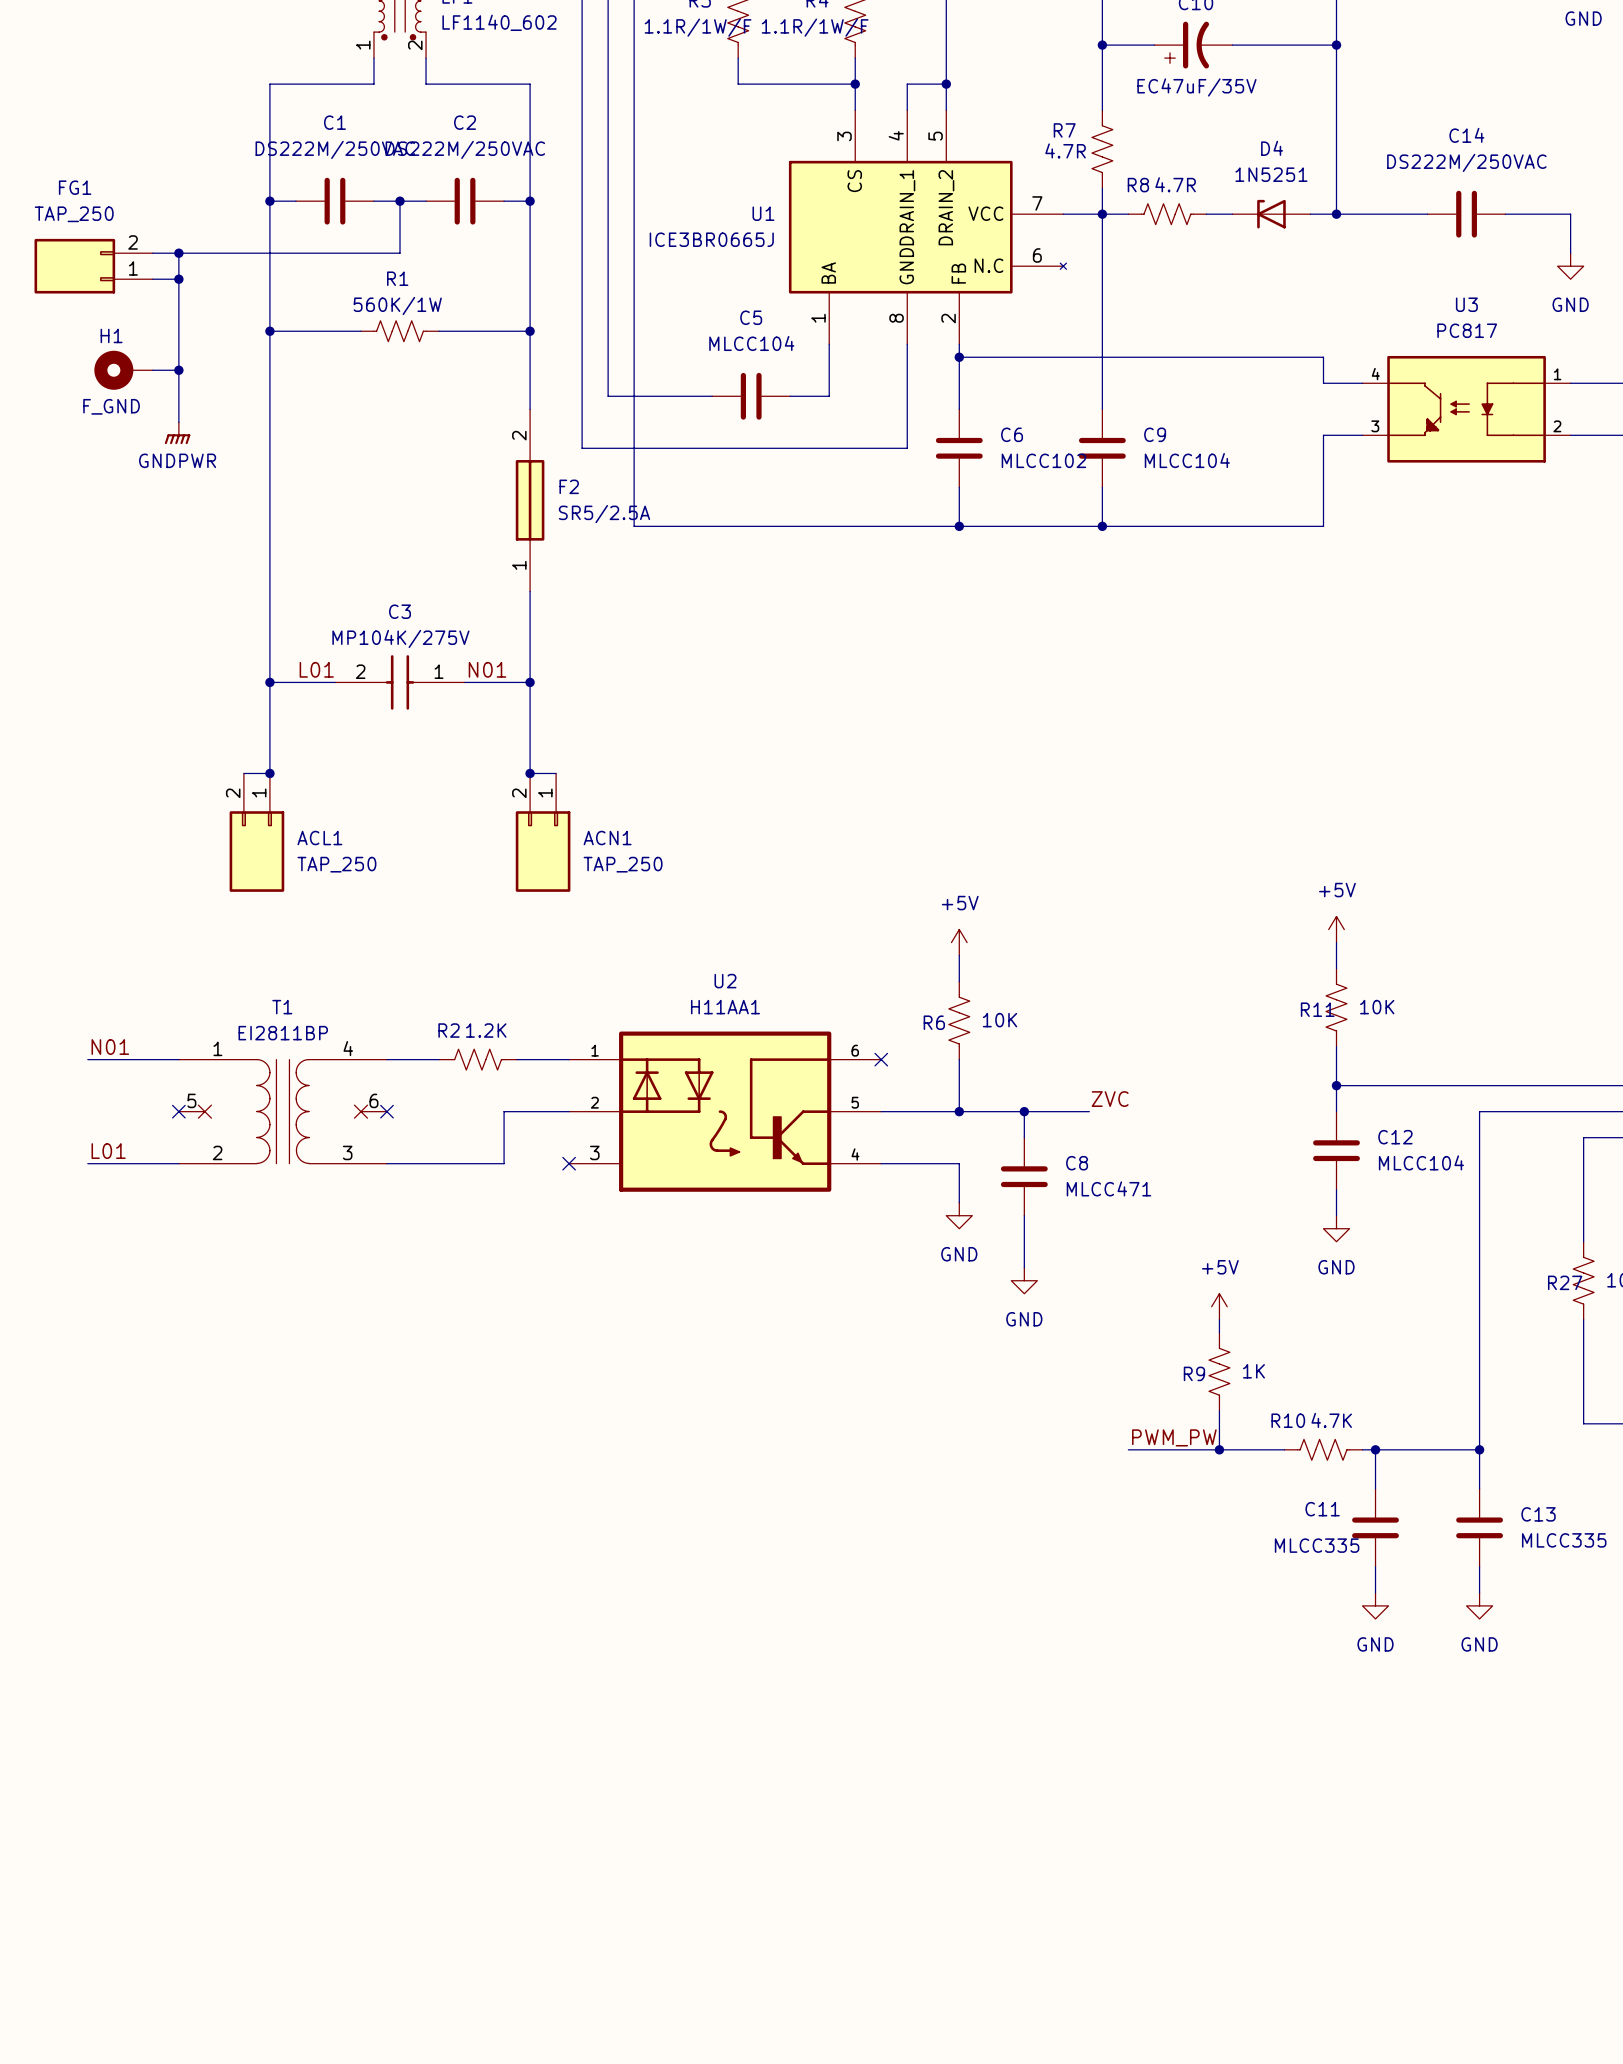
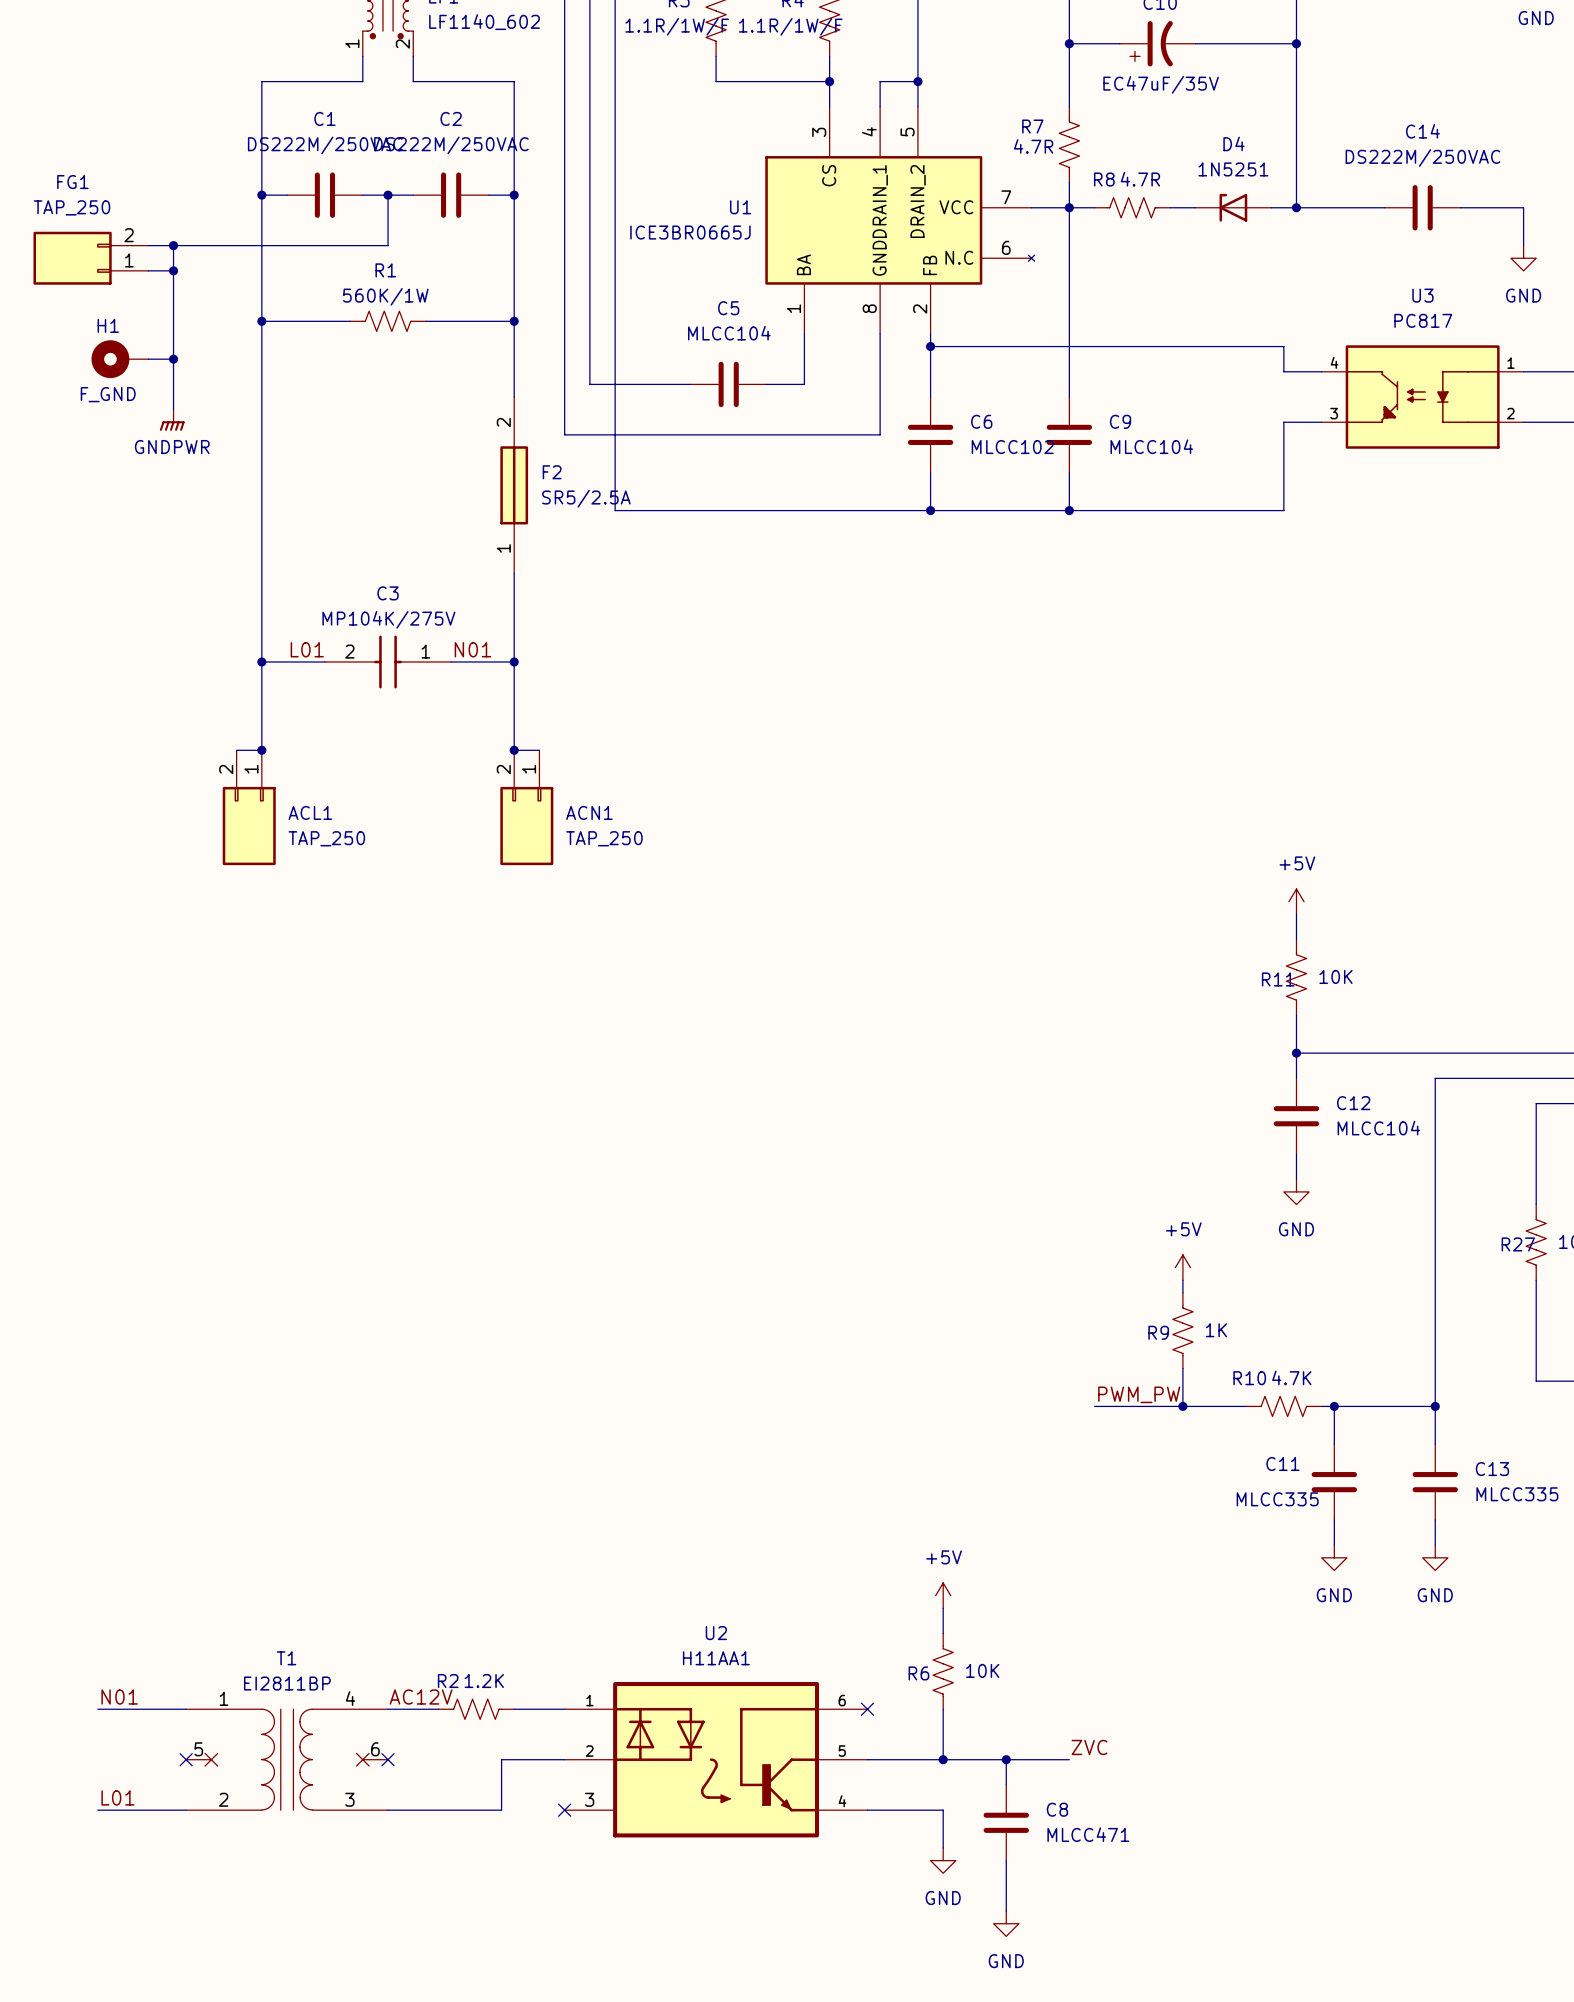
power symbol: +5V (959, 942) -> none
wire: (959, 955) (959, 981) -> none
R6 position: (959, 1020) -> (943, 1671)
label: N01 (110, 1047) -> none
wire: (87, 1059) (178, 1059) -> none
wire: (386, 1059) (439, 1059) -> none
R2 position: (478, 1059) -> (476, 1709)
wire: (517, 1059) (569, 1059) -> none
no-connect mark: (881, 1059) -> none
wire: (959, 1059) (959, 1111) -> none
label: ZVC (1110, 1099) -> none
no-connect mark: (178, 1111) -> none
T1 position: (282, 1111) -> (287, 1759)
no-connect mark: (386, 1111) -> none
wire: (569, 1111) (504, 1111) (504, 1163) (386, 1163) -> none
U2 position: (725, 1111) -> (716, 1759)
wire: (881, 1111) (1089, 1111) -> none
junction: (959, 1111) -> none
wire: (1024, 1111) (1024, 1137) -> none
junction: (1024, 1111) -> none
label: L01 (108, 1151) -> none
wire: (87, 1163) (178, 1163) -> none
no-connect mark: (569, 1163) -> none
wire: (881, 1163) (959, 1163) (959, 1202) -> none
C8 position: (1024, 1176) -> (1006, 1822)
power symbol: GND (959, 1215) -> none
wire: (1024, 1215) (1024, 1267) -> none
power symbol: GND (1024, 1280) -> none
power symbol: none -> +5V (943, 1595)
wire: none -> (943, 1608) (943, 1633)
label: none -> N01 (119, 1697)
label: none -> AC12V (421, 1697)
wire: none -> (97, 1709) (186, 1709)
wire: none -> (388, 1709) (438, 1709)
wire: none -> (514, 1709) (564, 1709)
no-connect mark: none -> (867, 1709)
wire: none -> (943, 1709) (943, 1759)
label: none -> ZVC (1089, 1747)
no-connect mark: none -> (186, 1759)
no-connect mark: none -> (388, 1759)
wire: none -> (564, 1759) (501, 1759) (501, 1810) (388, 1810)
wire: none -> (867, 1759) (1069, 1759)
junction: none -> (943, 1759)
wire: none -> (1006, 1759) (1006, 1784)
junction: none -> (1006, 1759)
label: none -> L01 (117, 1797)
wire: none -> (97, 1810) (186, 1810)
no-connect mark: none -> (564, 1810)
wire: none -> (867, 1810) (943, 1810) (943, 1848)
power symbol: none -> GND (943, 1860)
wire: none -> (1006, 1860) (1006, 1911)
power symbol: none -> GND (1006, 1923)

